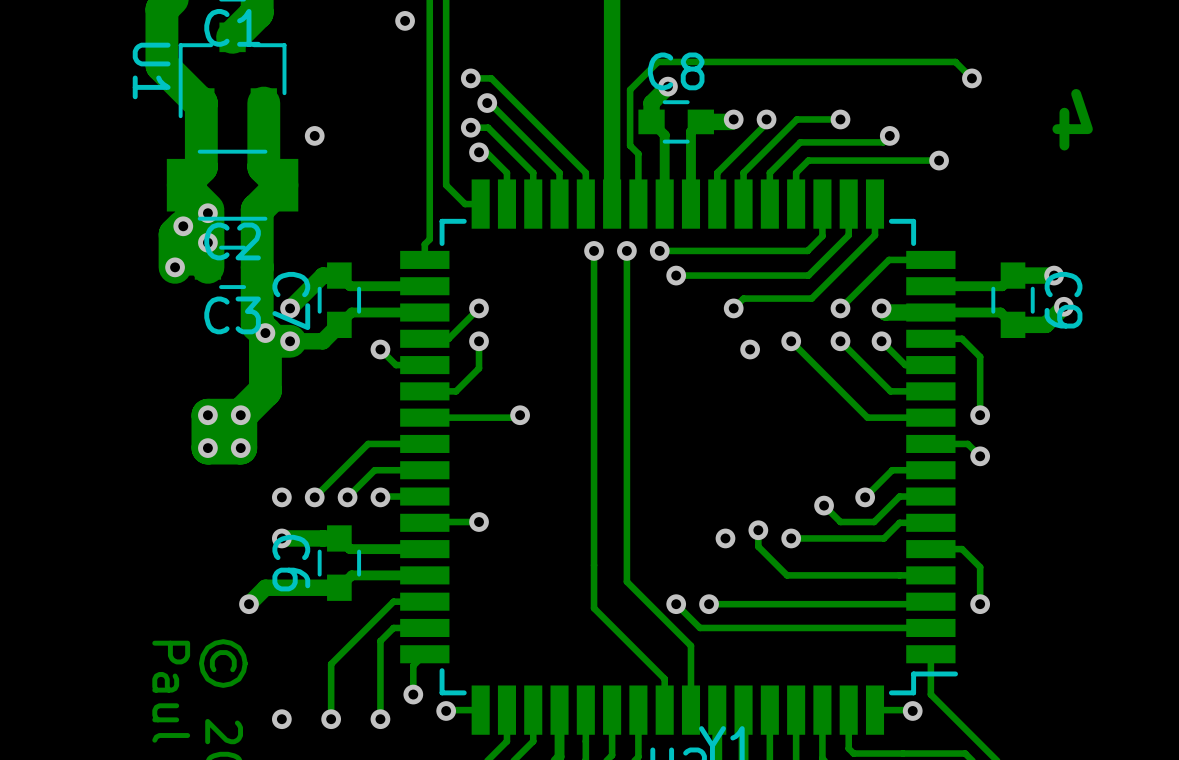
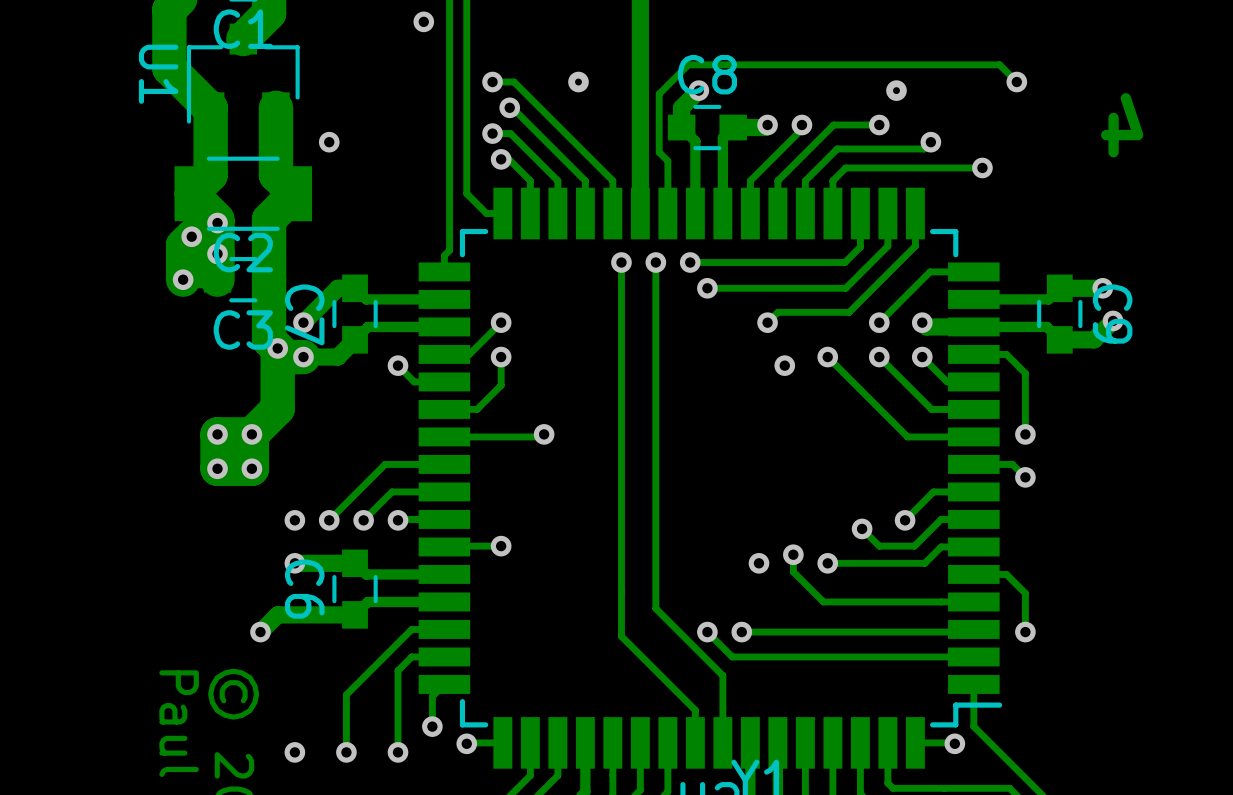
via: none -> (578, 82)
via: none -> (896, 90)

